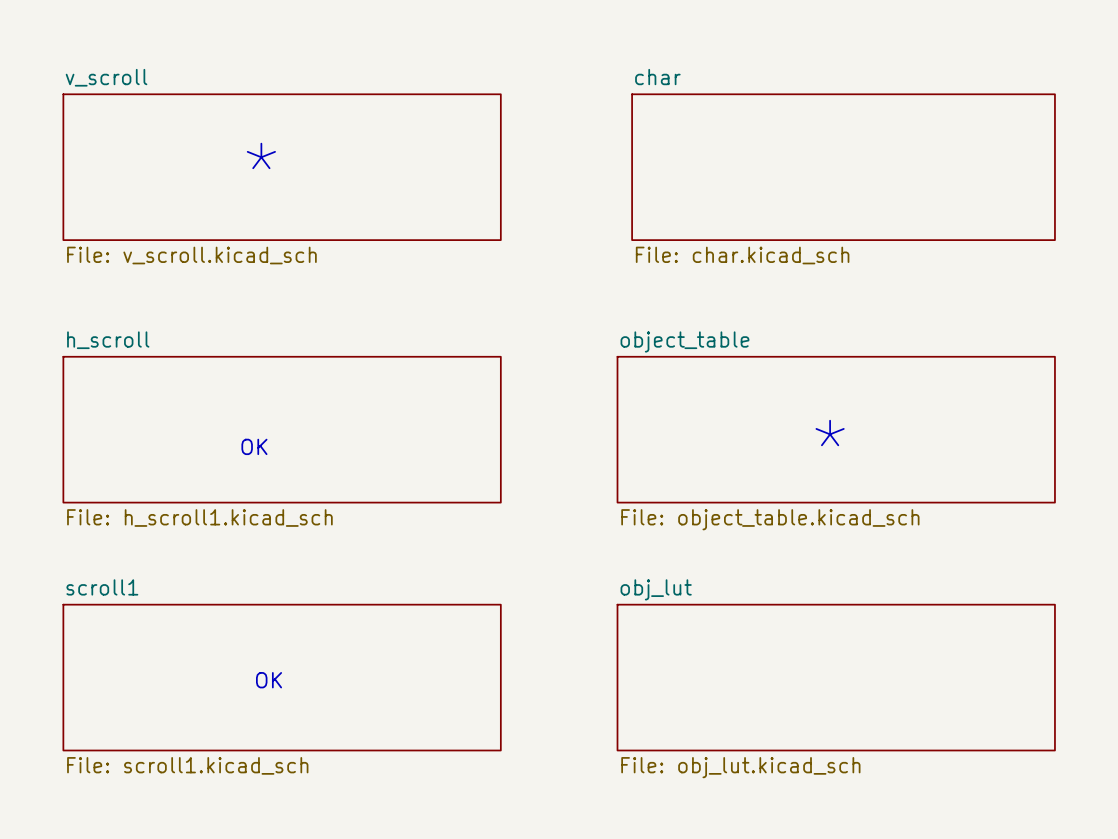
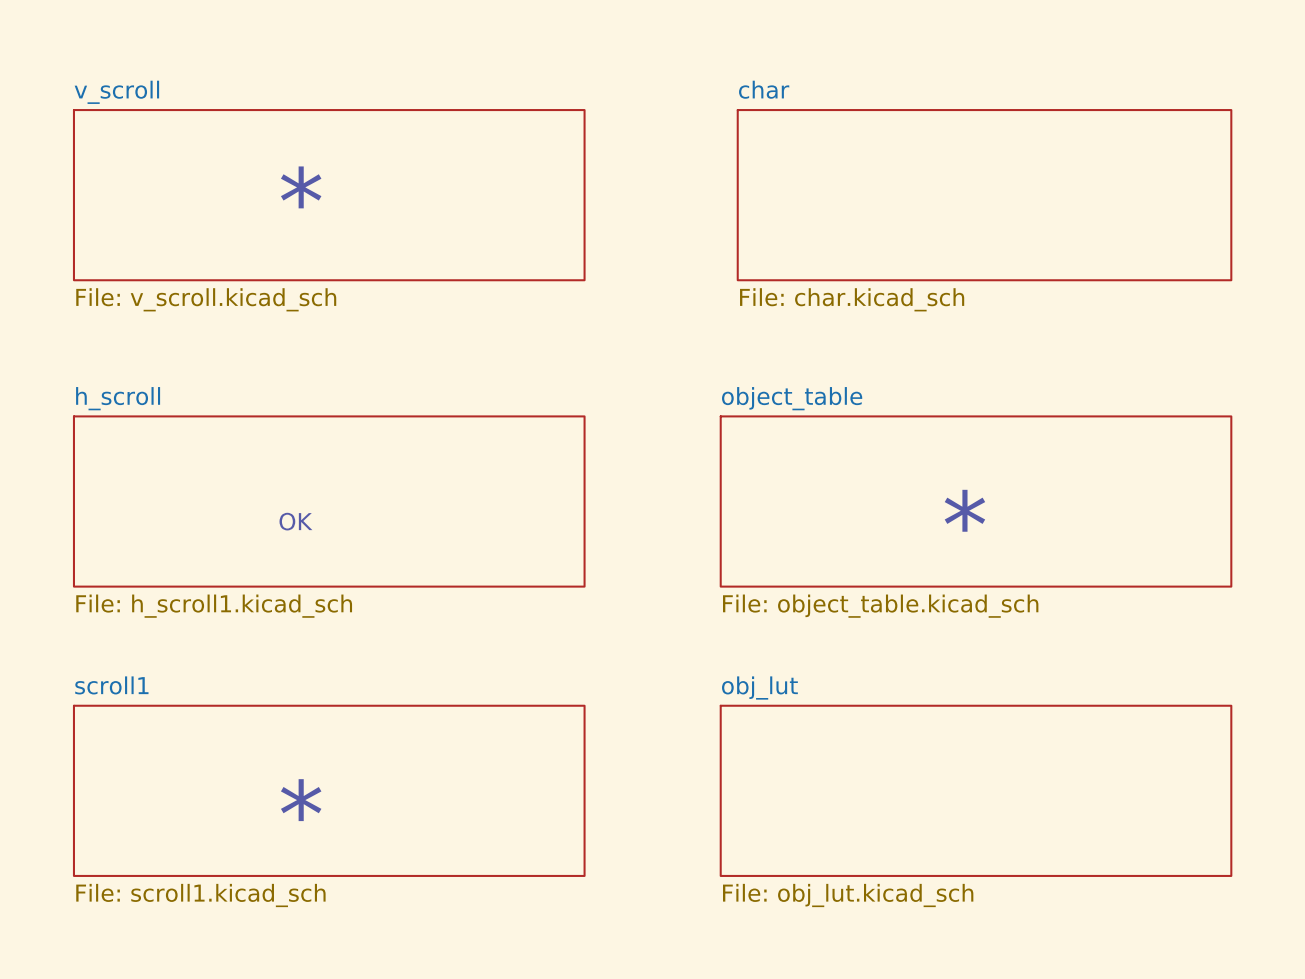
text: none -> * (301, 800)
text: OK (269, 680) -> none

